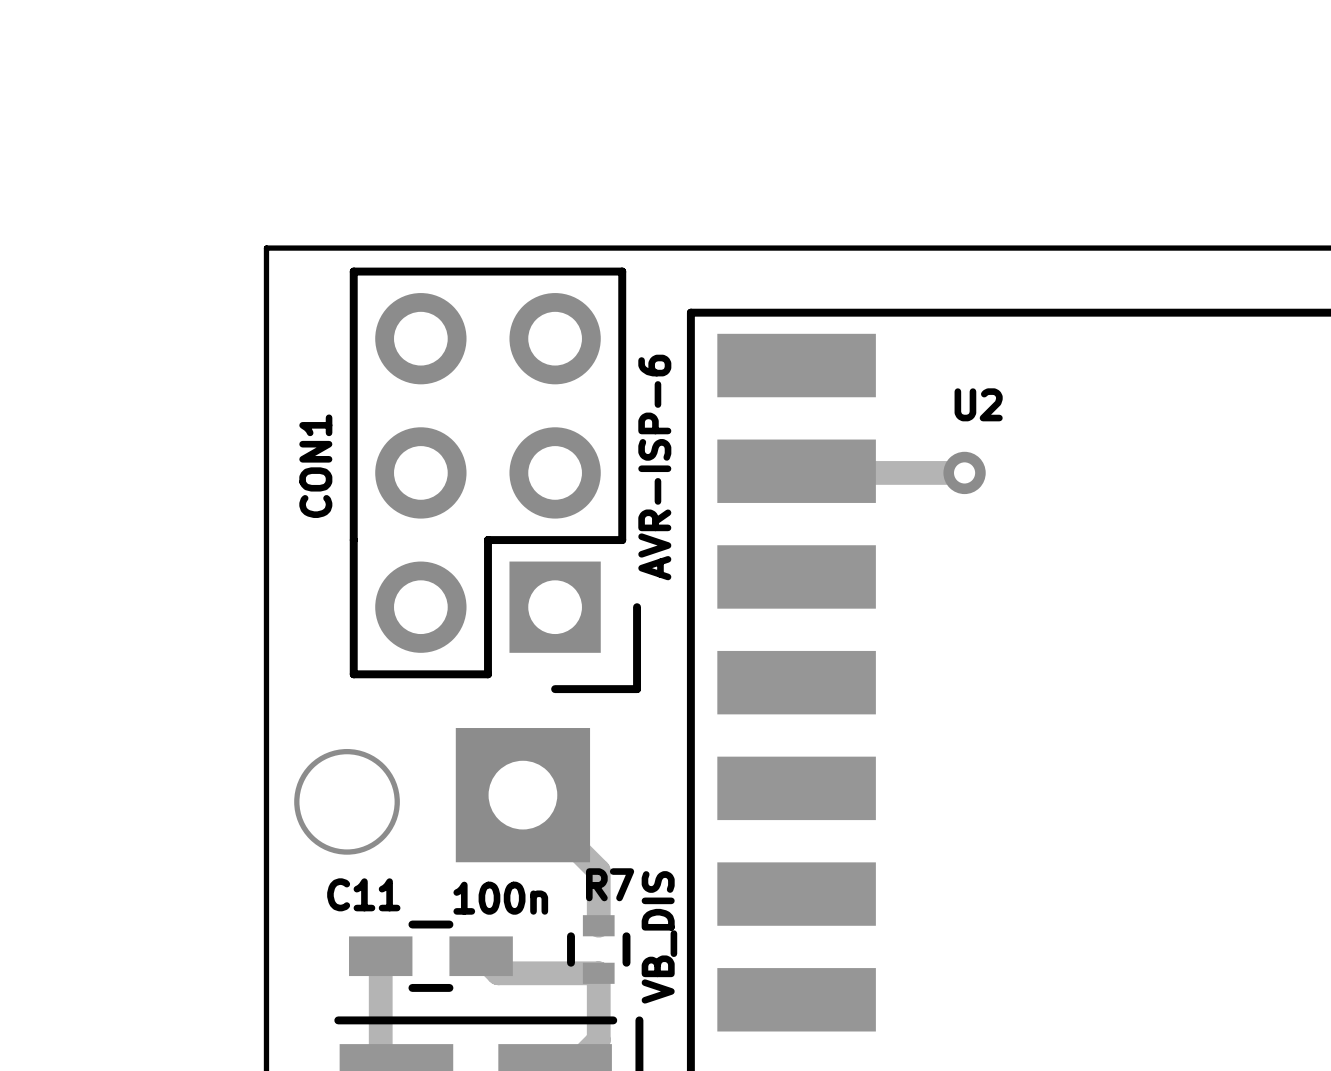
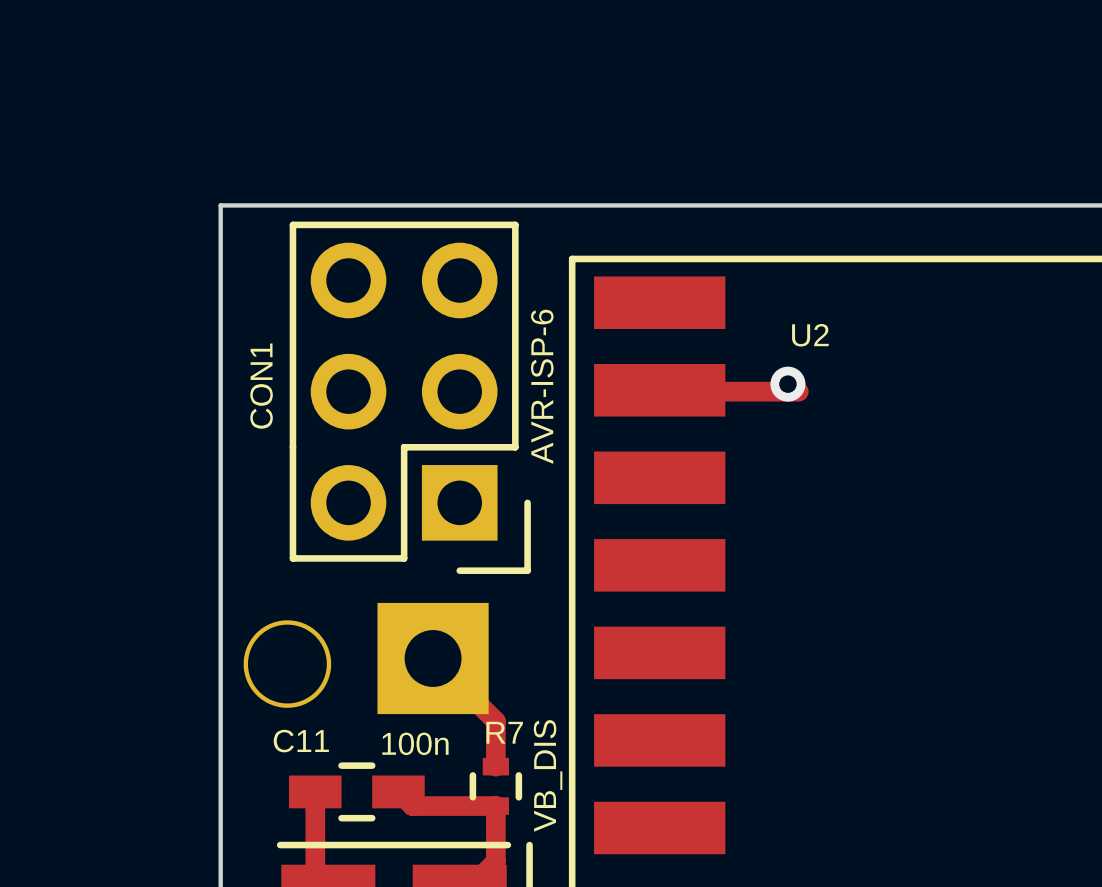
via position: (964, 472) -> (787, 384)

